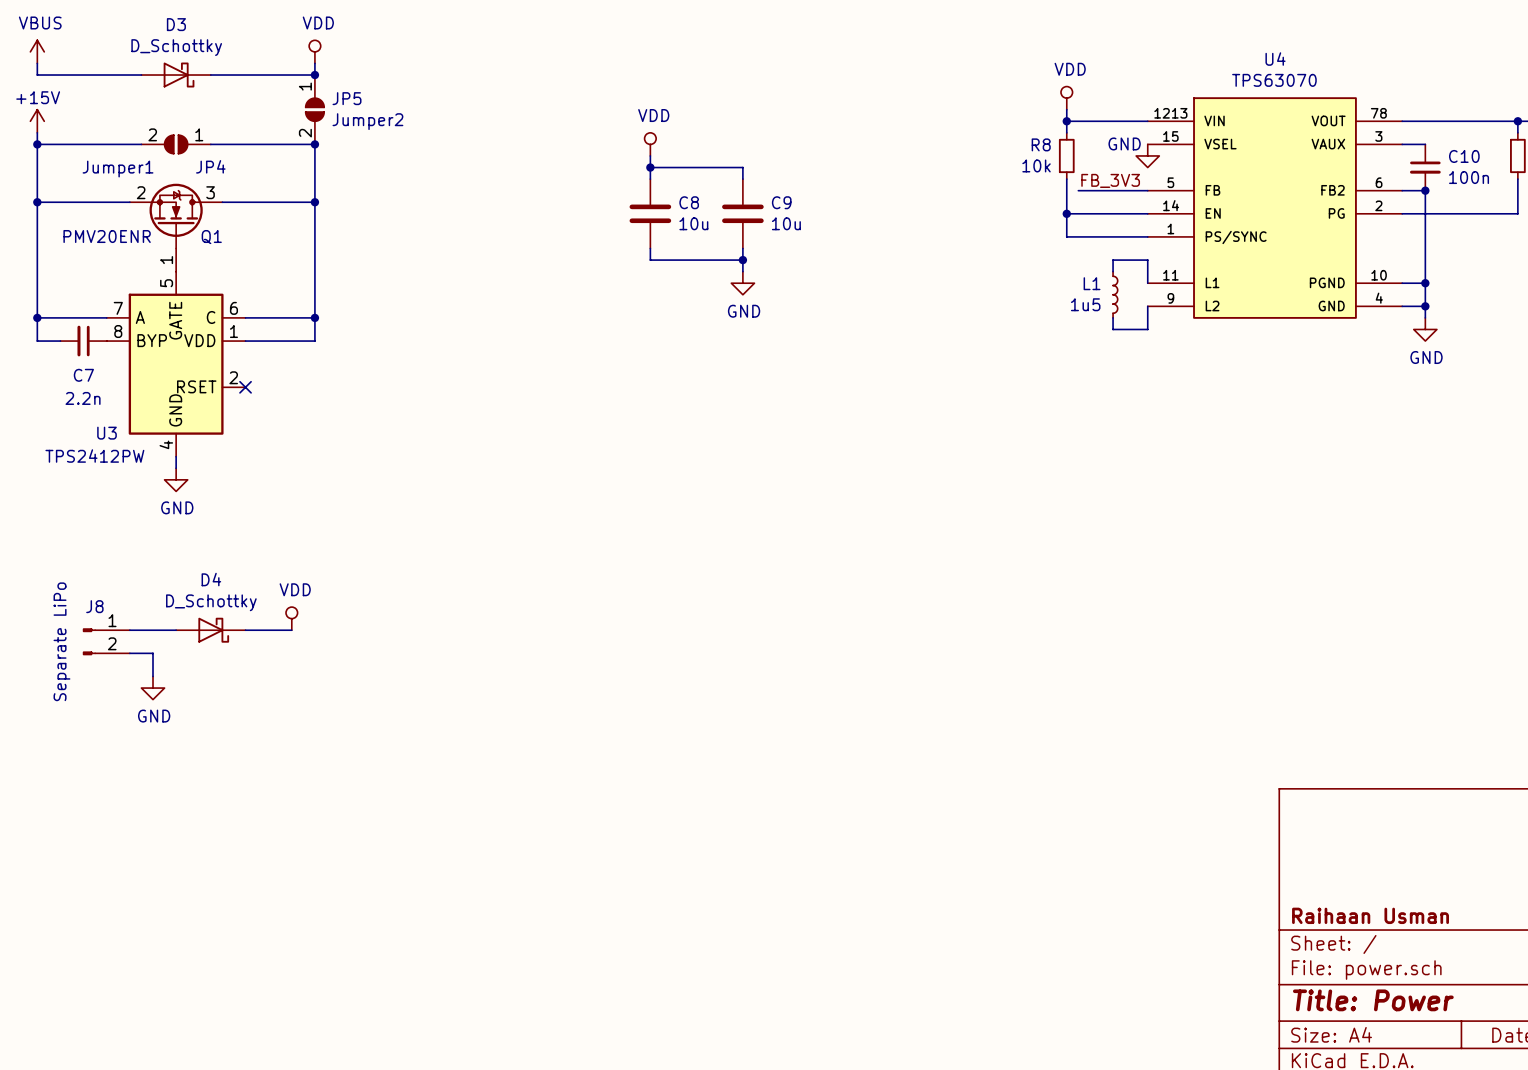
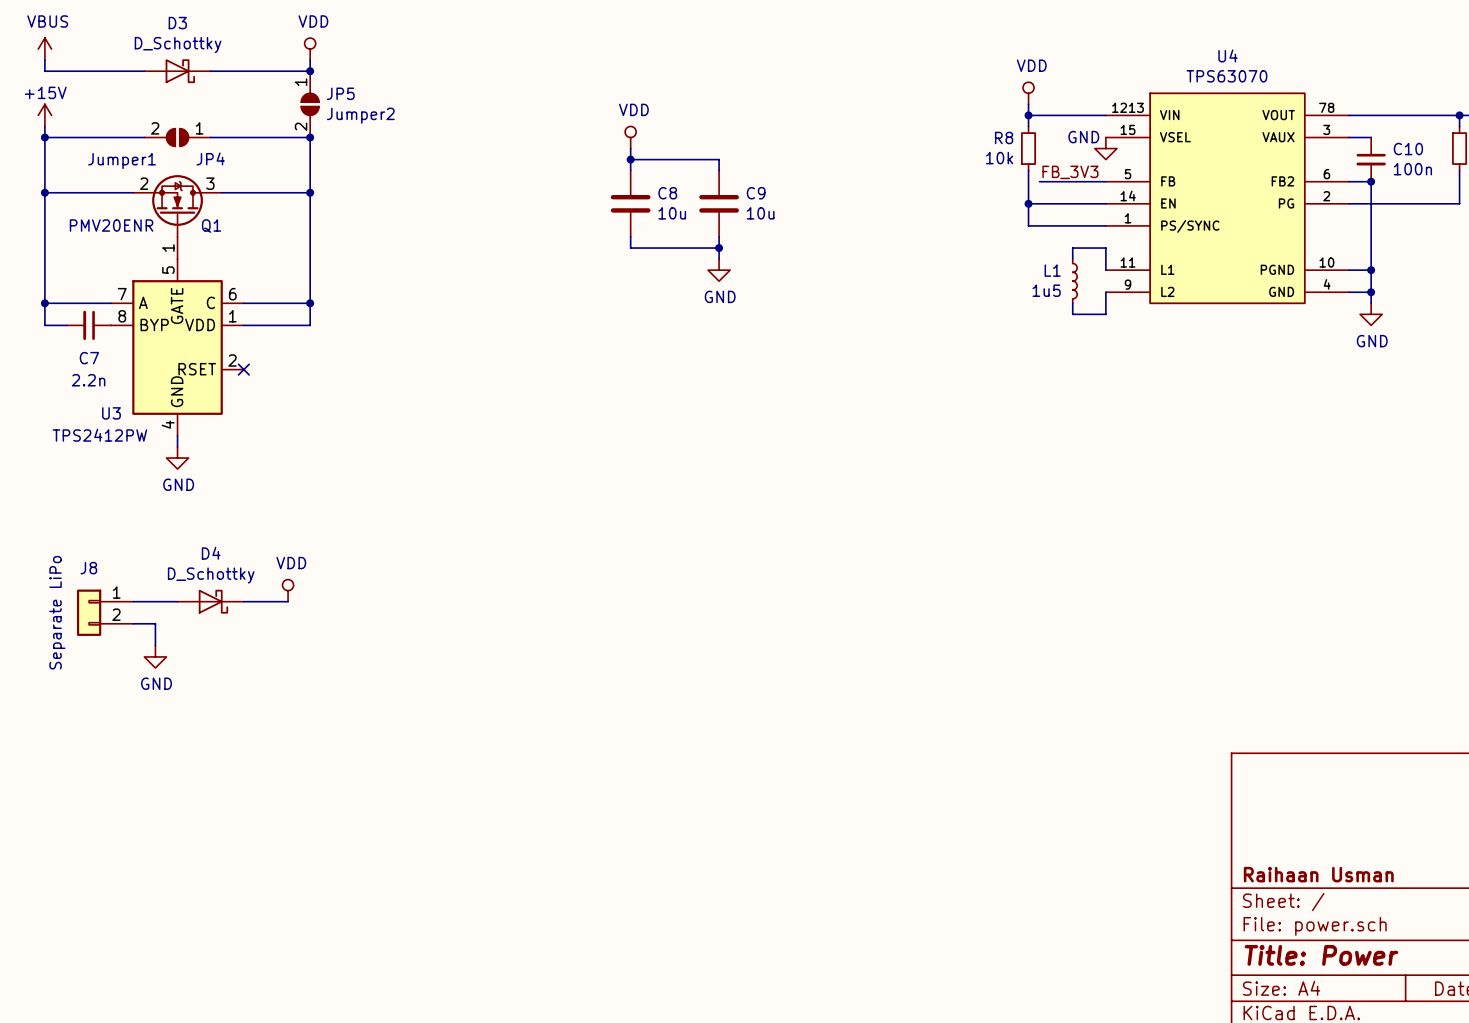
J8 symbol: [82, 628, 130, 656] -> [76, 589, 134, 636]

